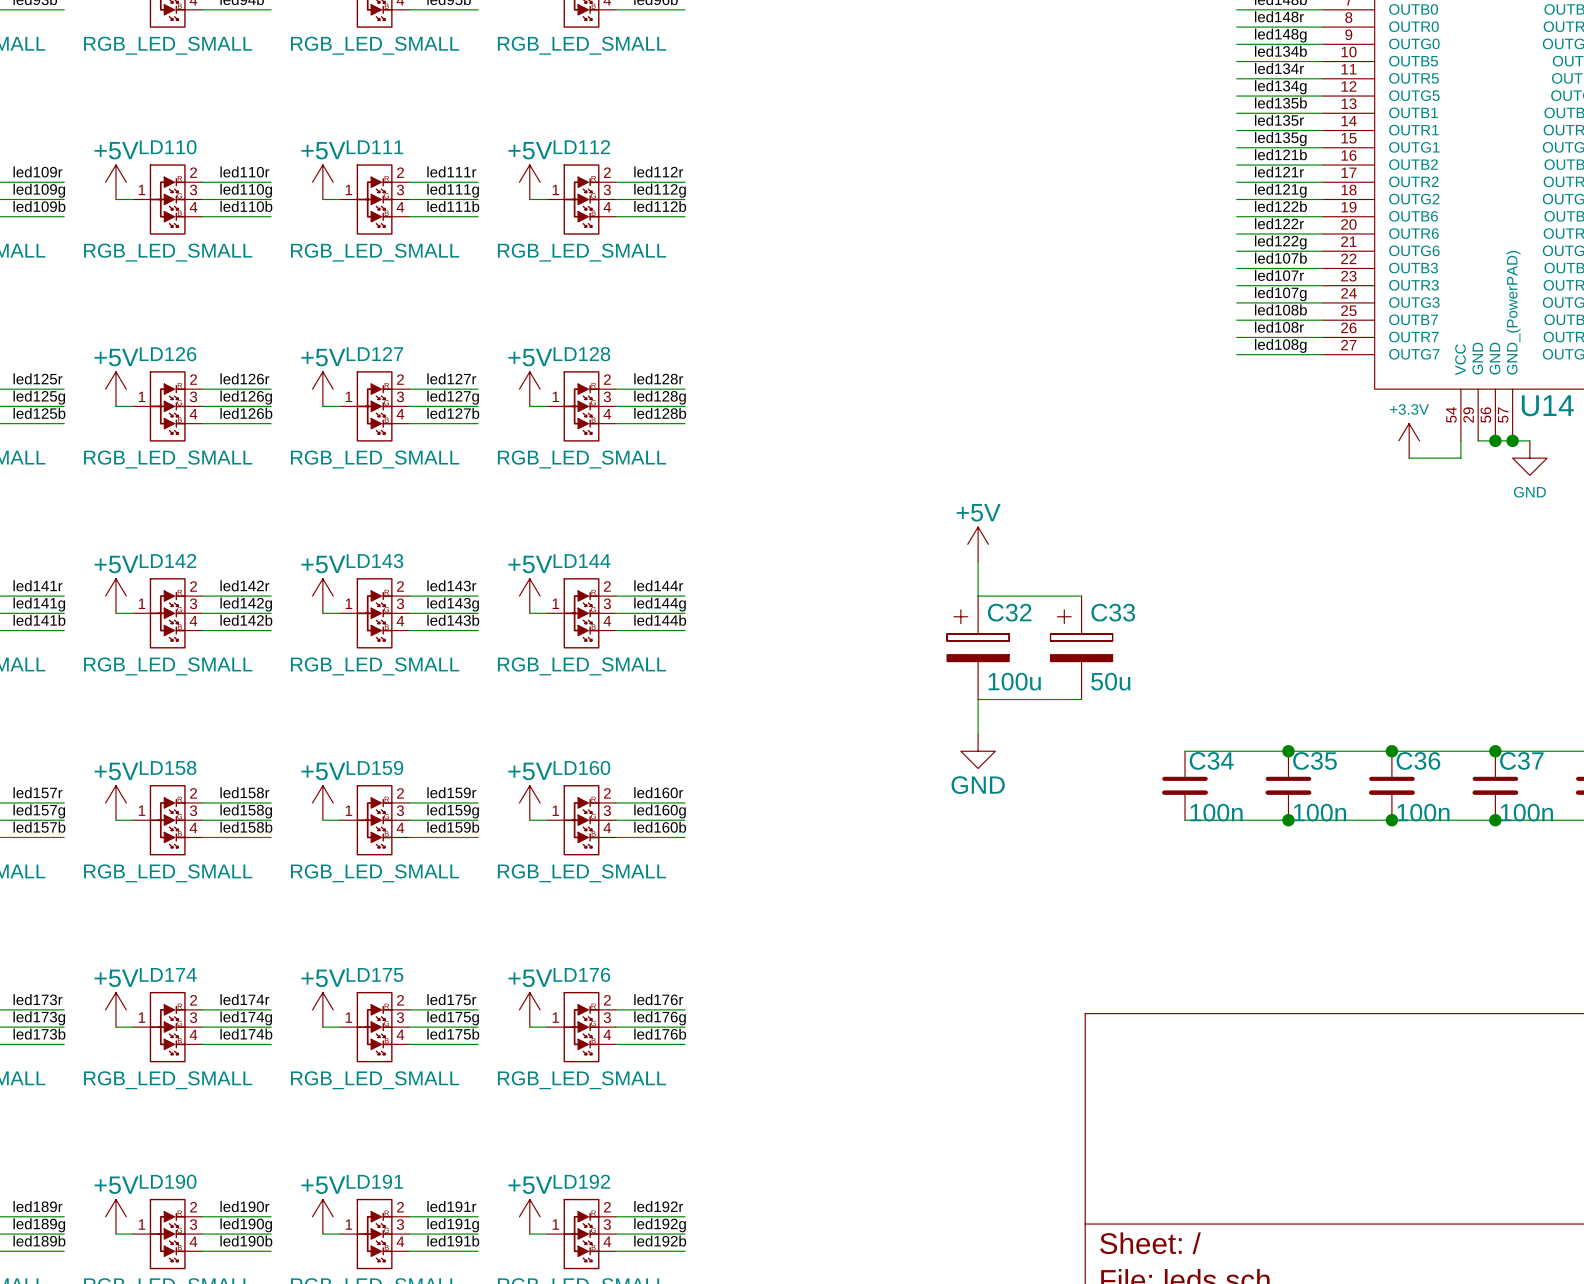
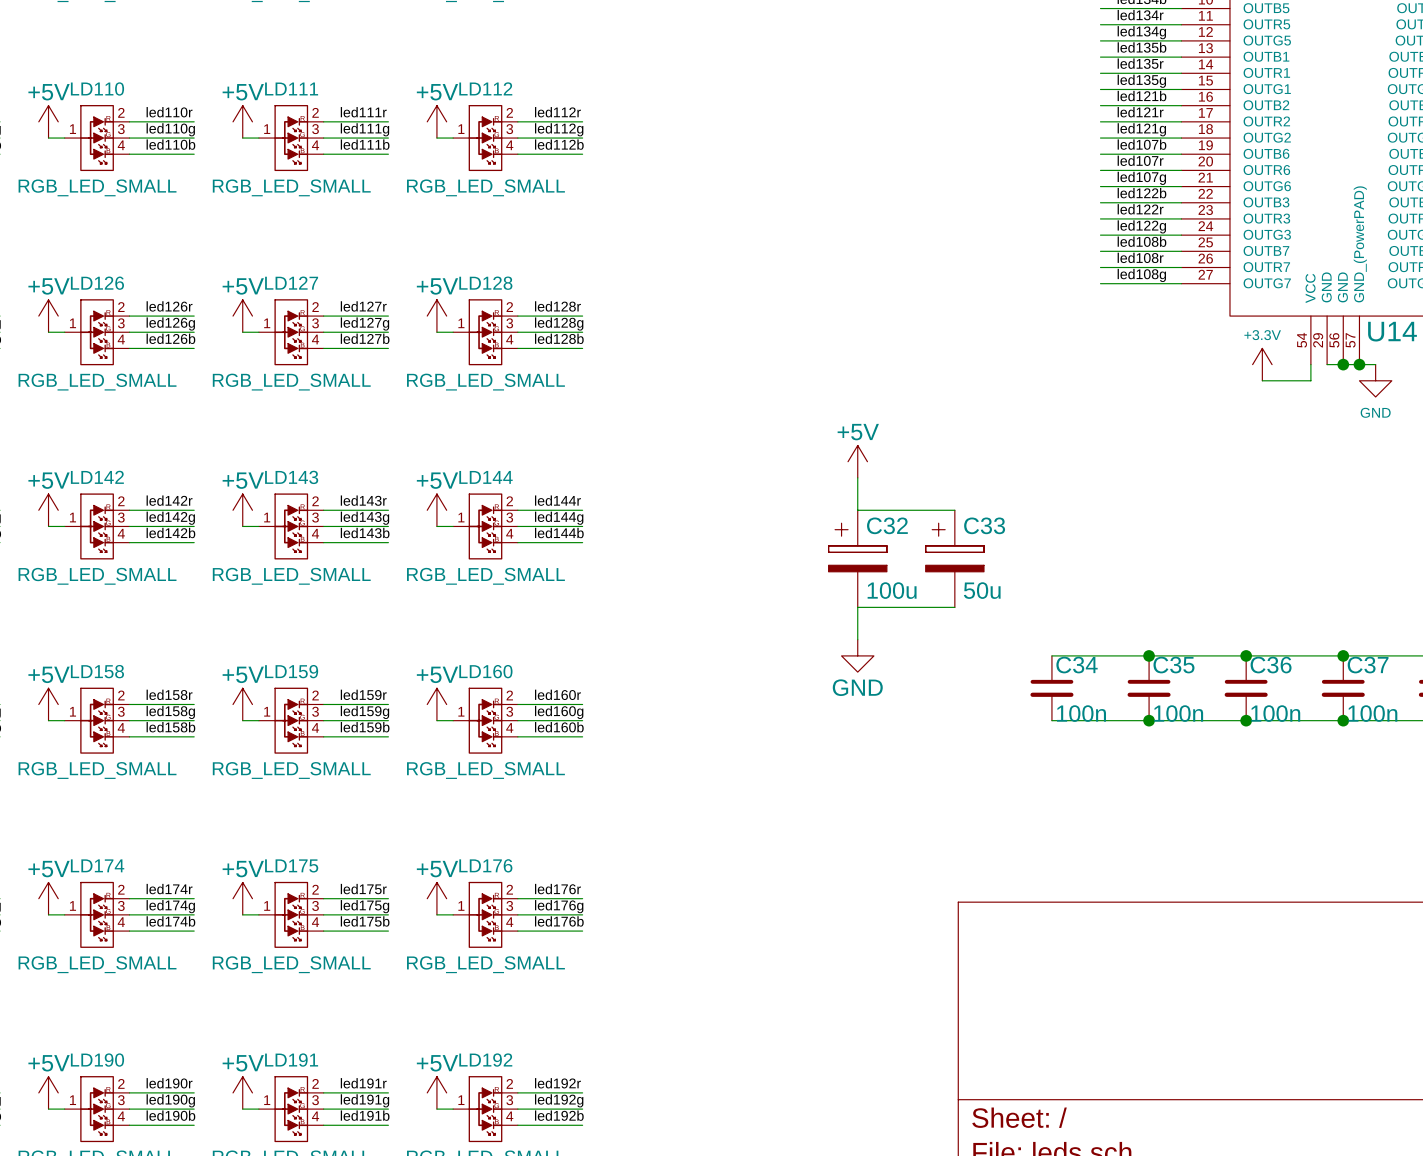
label: led122b (1280, 206) -> led107b (1141, 144)
label: led122r (1279, 223) -> led107r (1140, 160)
label: led122g (1280, 242) -> led107g (1141, 178)
label: led107b (1280, 258) -> led122b (1141, 193)
label: led107r (1279, 275) -> led122r (1140, 209)
label: led107g (1280, 294) -> led122g (1141, 226)

